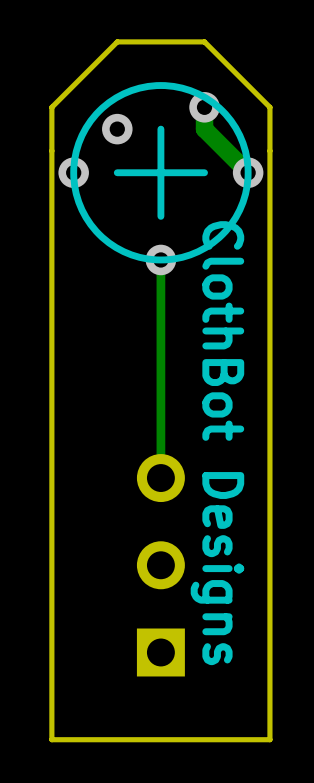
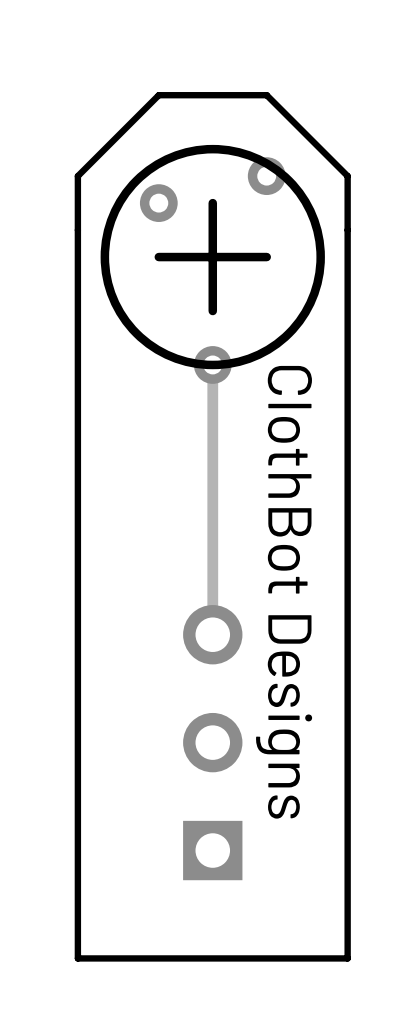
track: (204, 107) (204, 129) (248, 172) -> none
via: (73, 172) -> none
via: (248, 172) -> none

